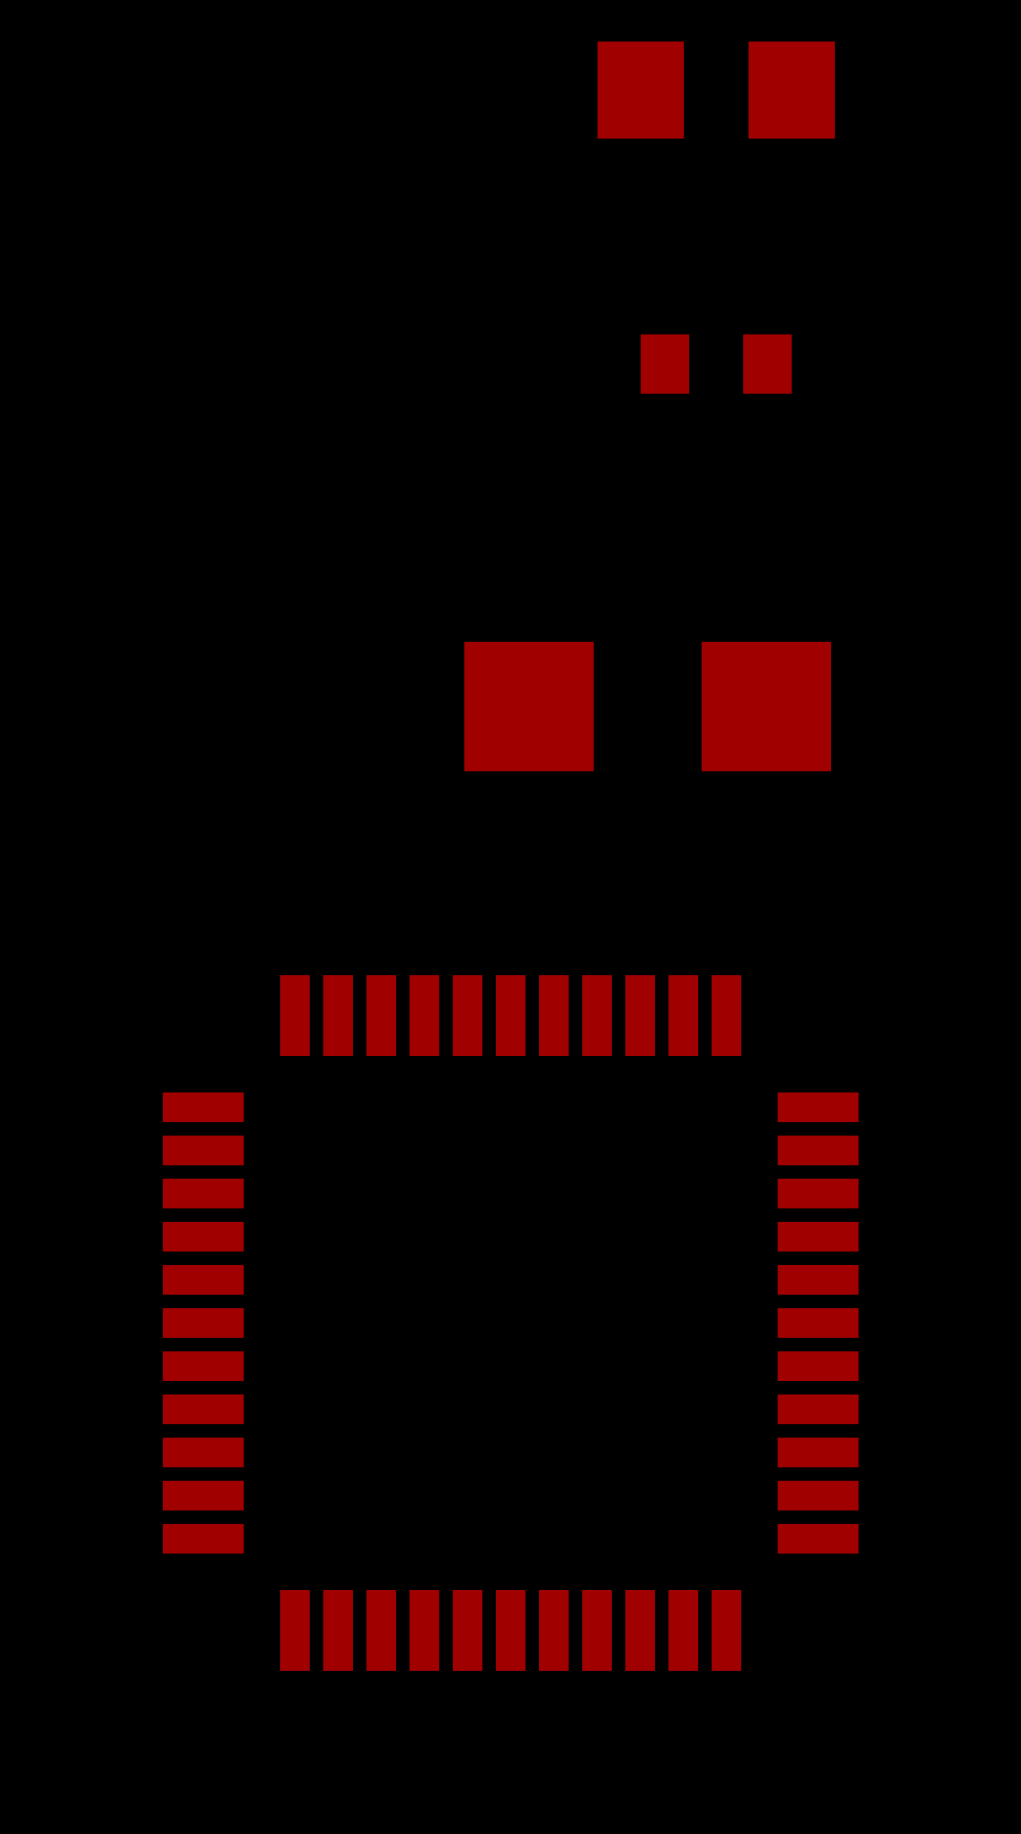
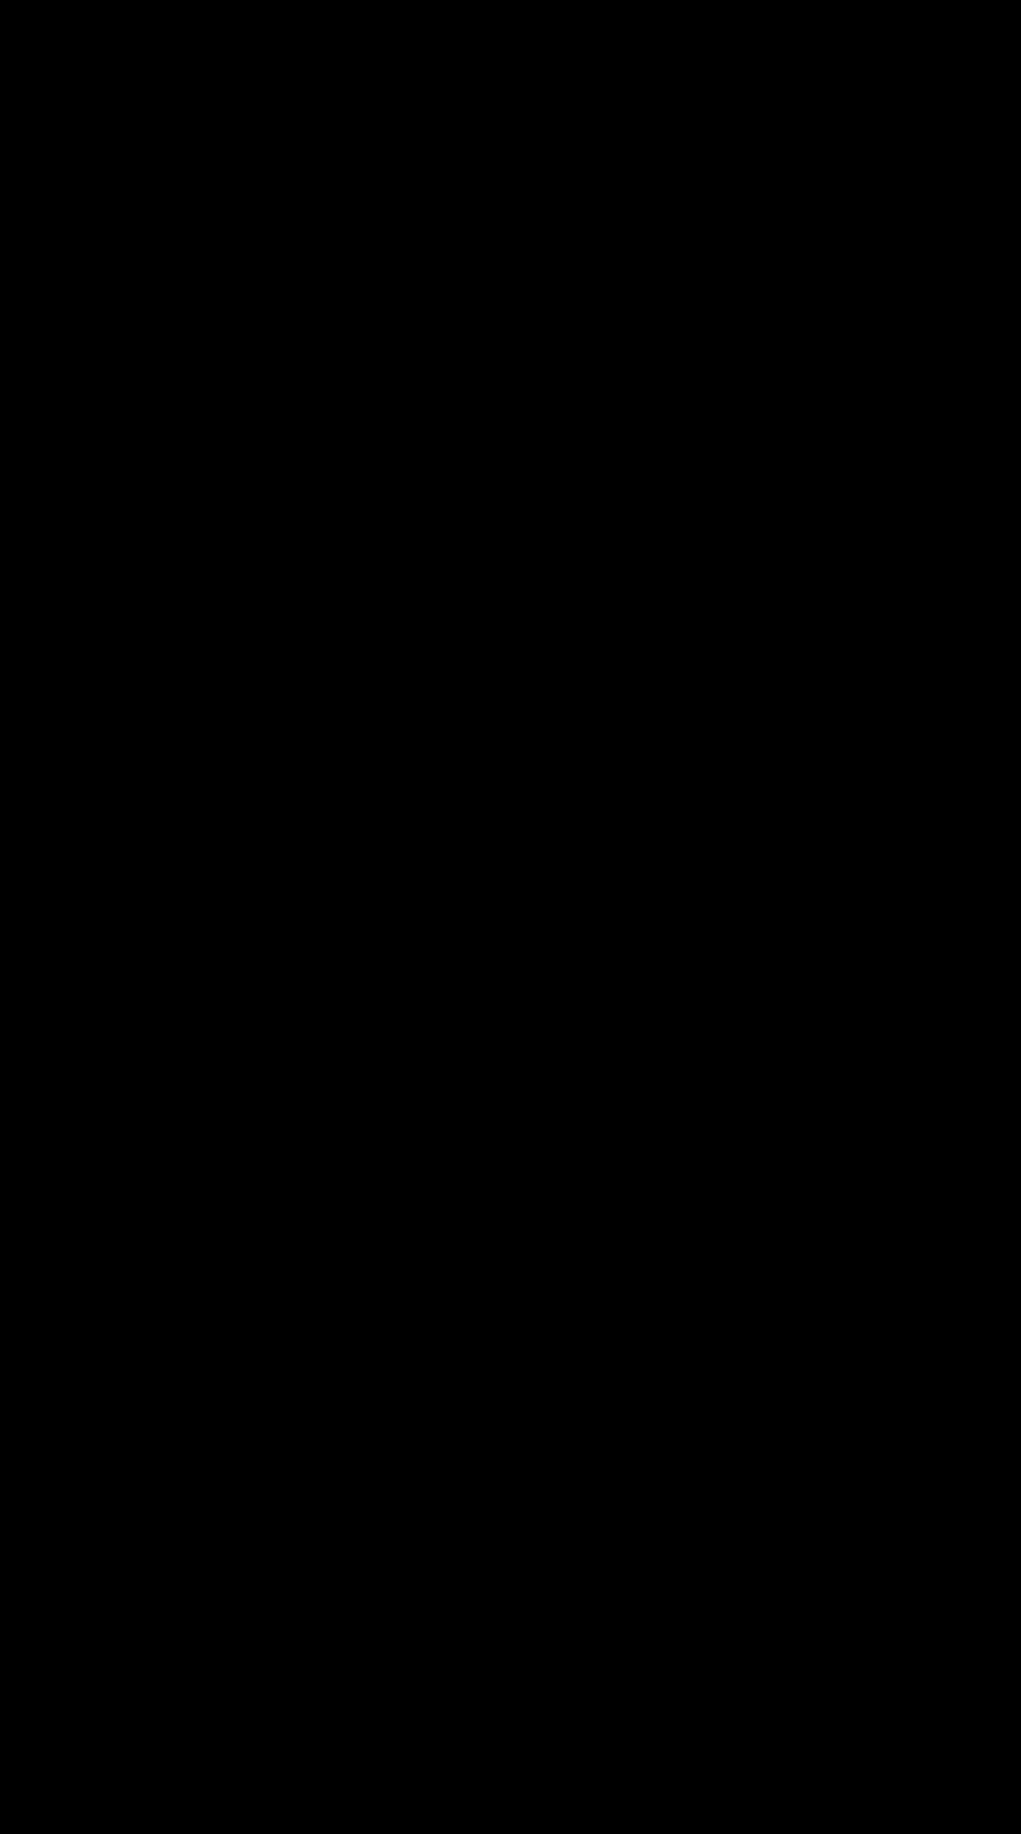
part: (716, 90) -> none
part: (716, 364) -> none
part: (647, 706) -> none
part: (510, 1323) -> none

